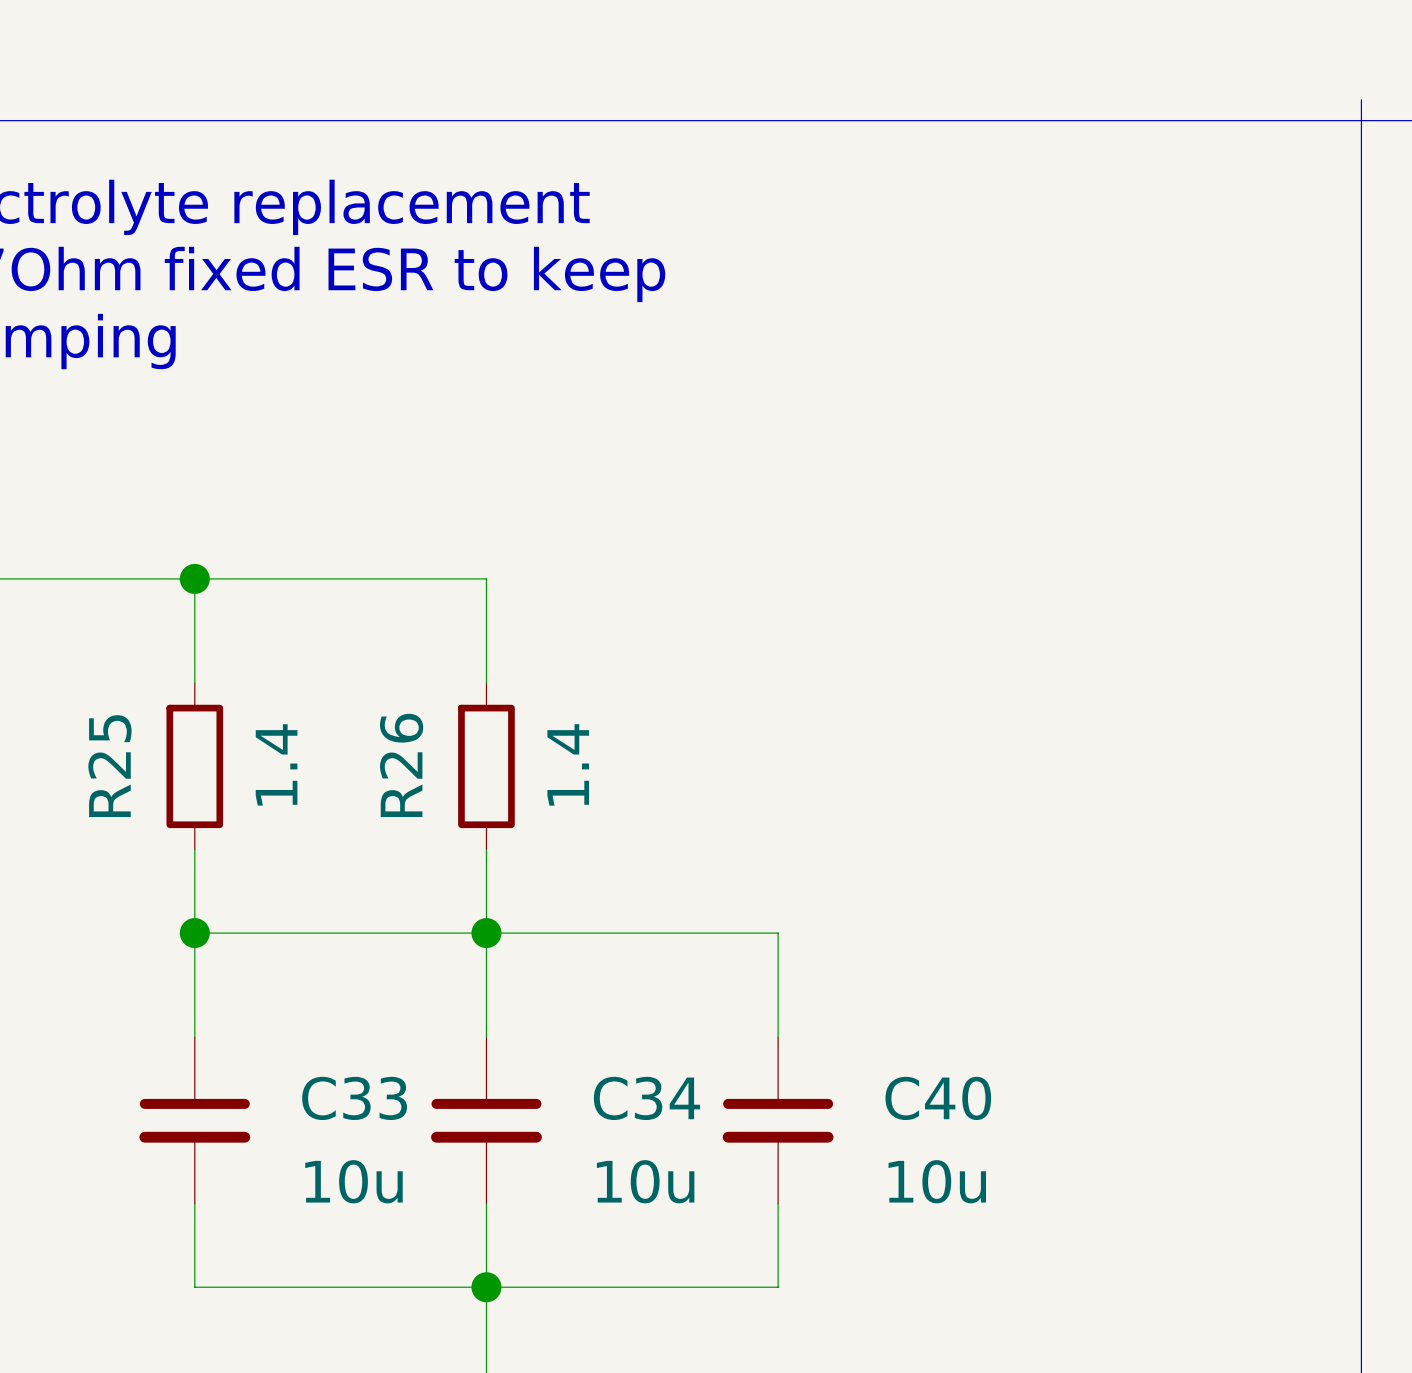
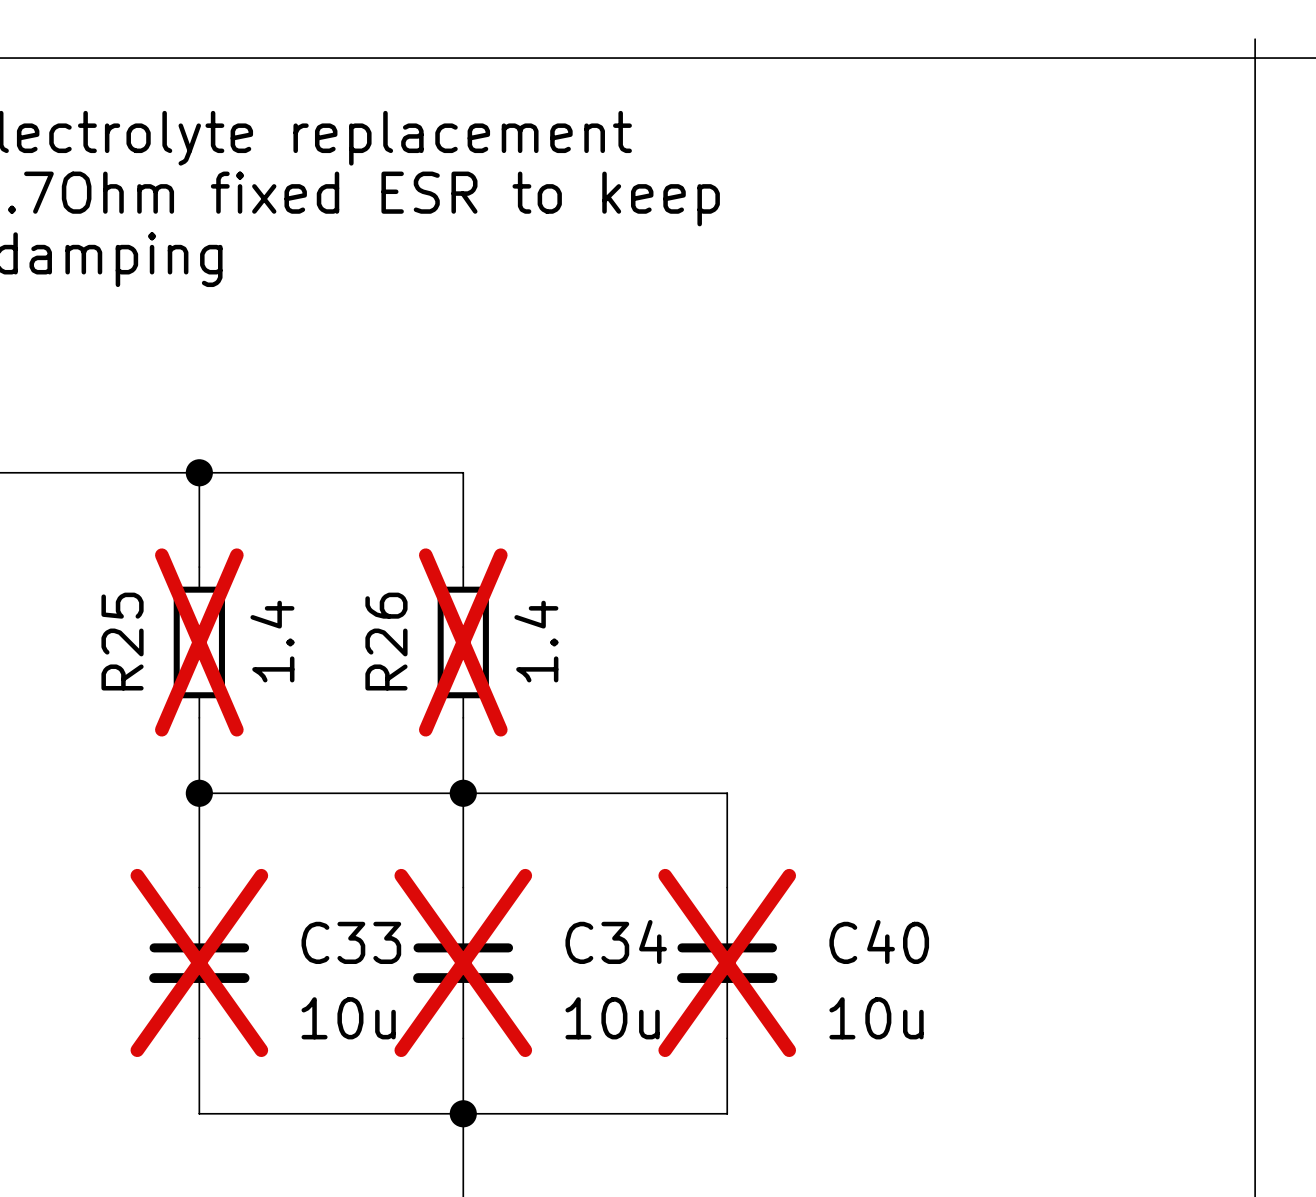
R25 do-not-place cross: none -> (199, 642)
R26 do-not-place cross: none -> (463, 642)
C33 do-not-place cross: none -> (199, 962)
C34 do-not-place cross: none -> (463, 962)
C40 do-not-place cross: none -> (727, 962)

